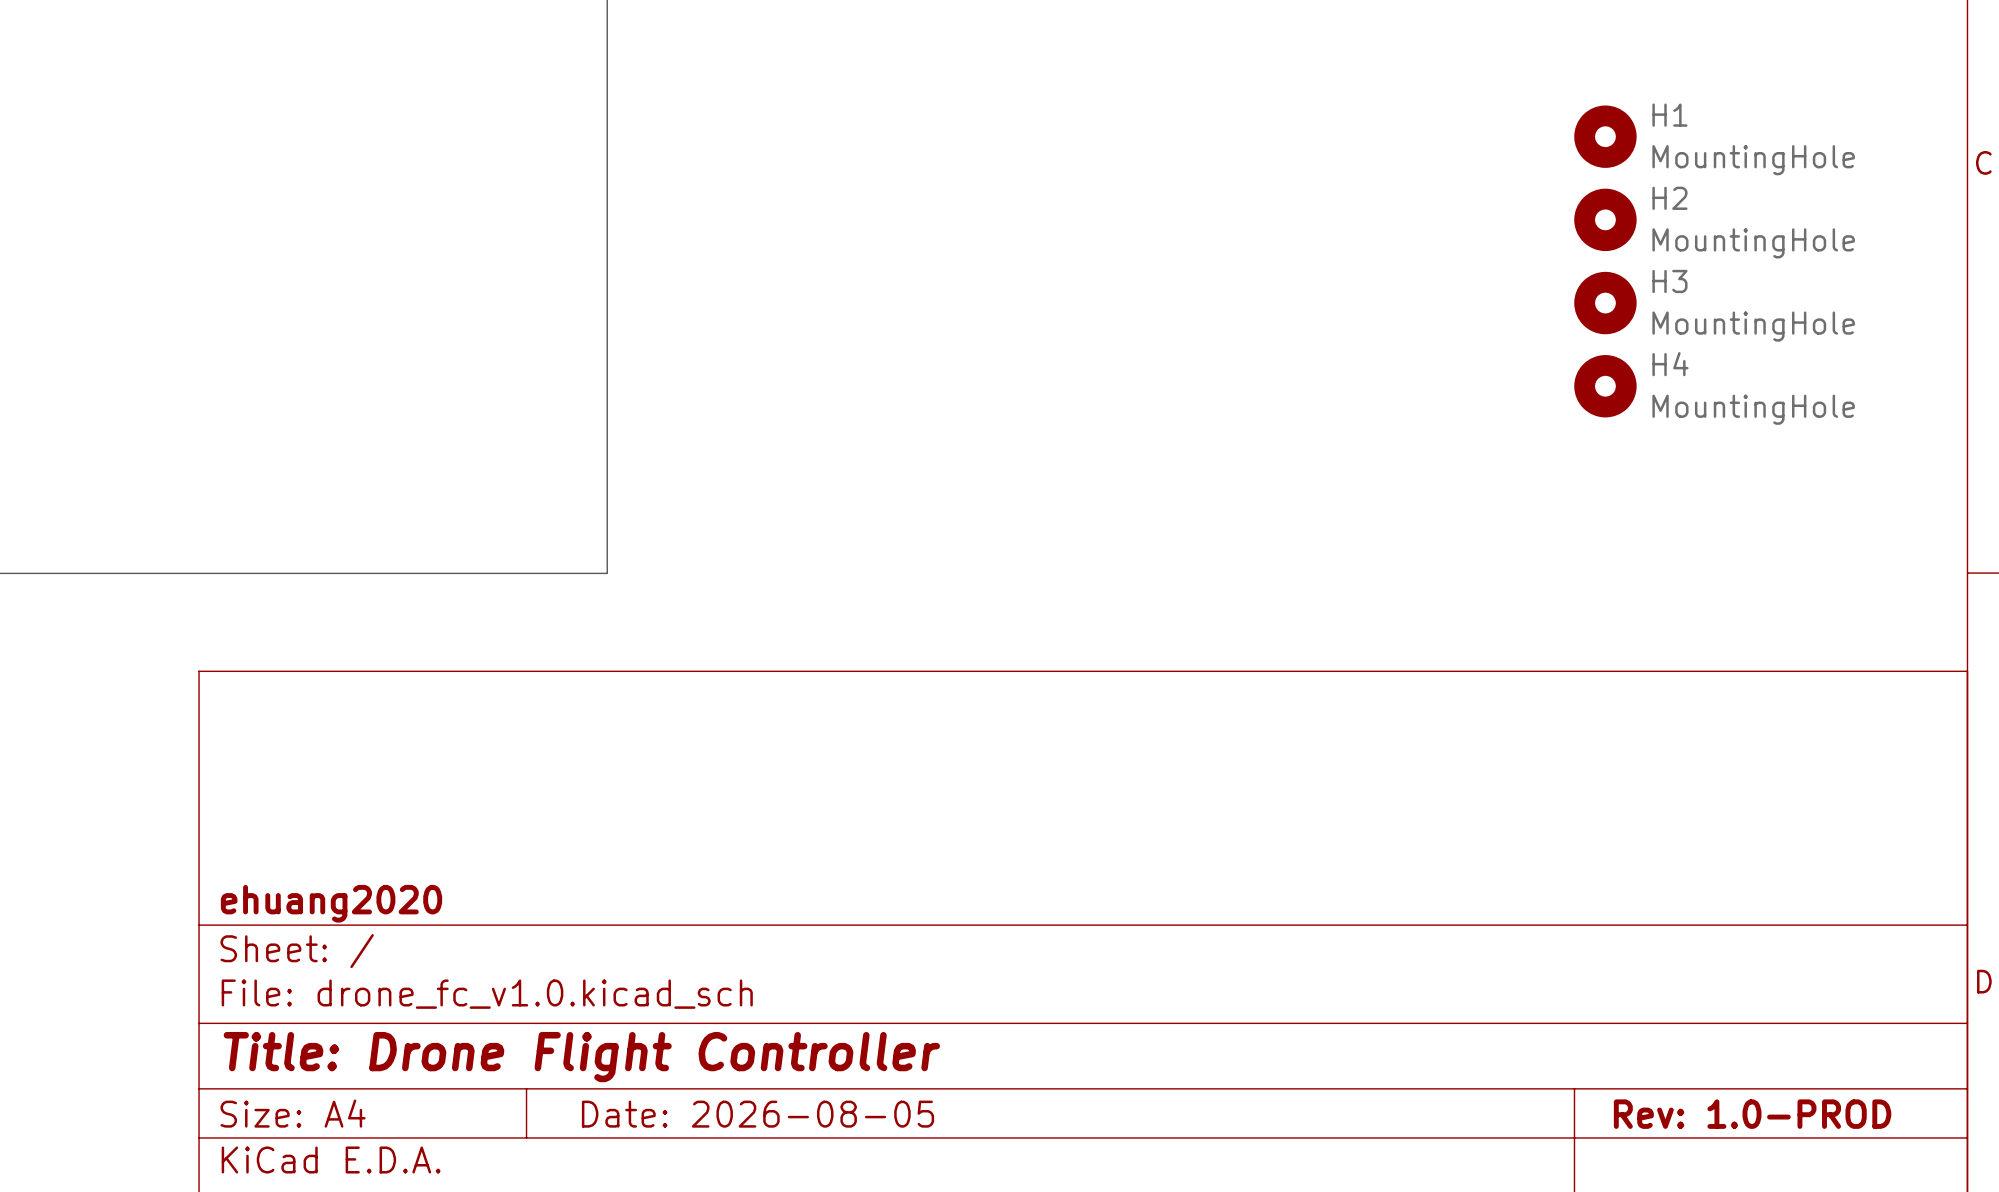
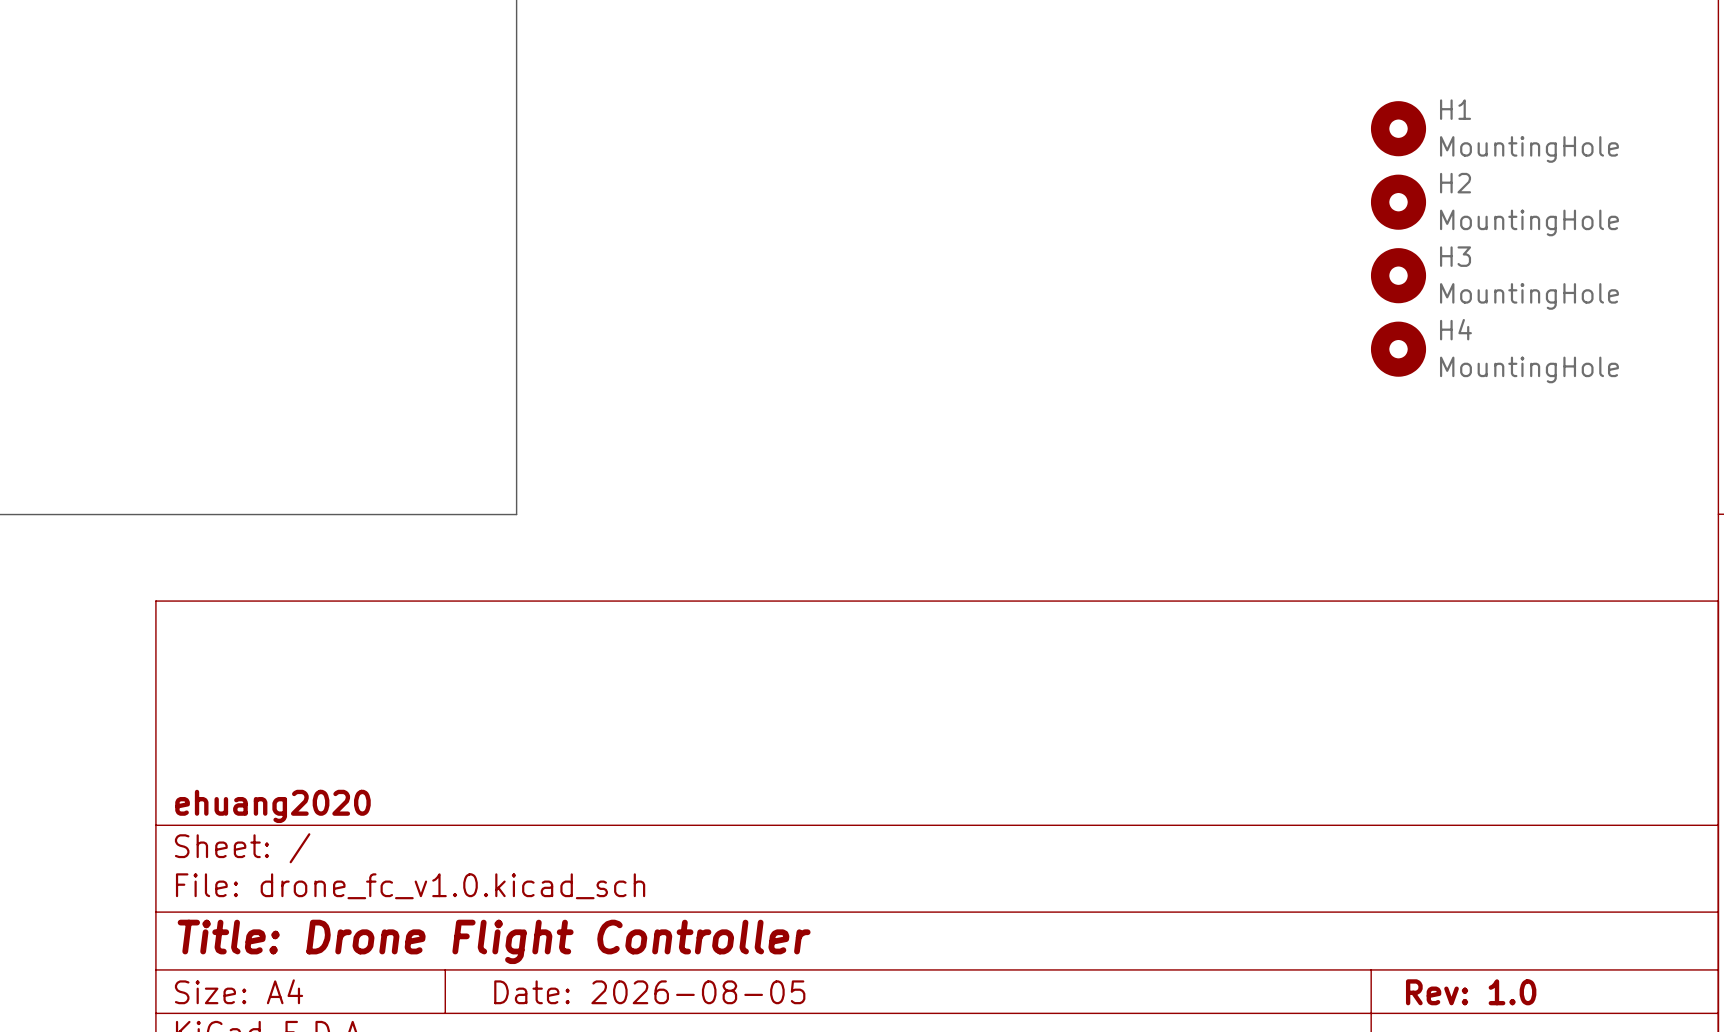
title block: Rev: 1.0-PROD (1752, 1114) -> Rev: 1.0 (1471, 992)

